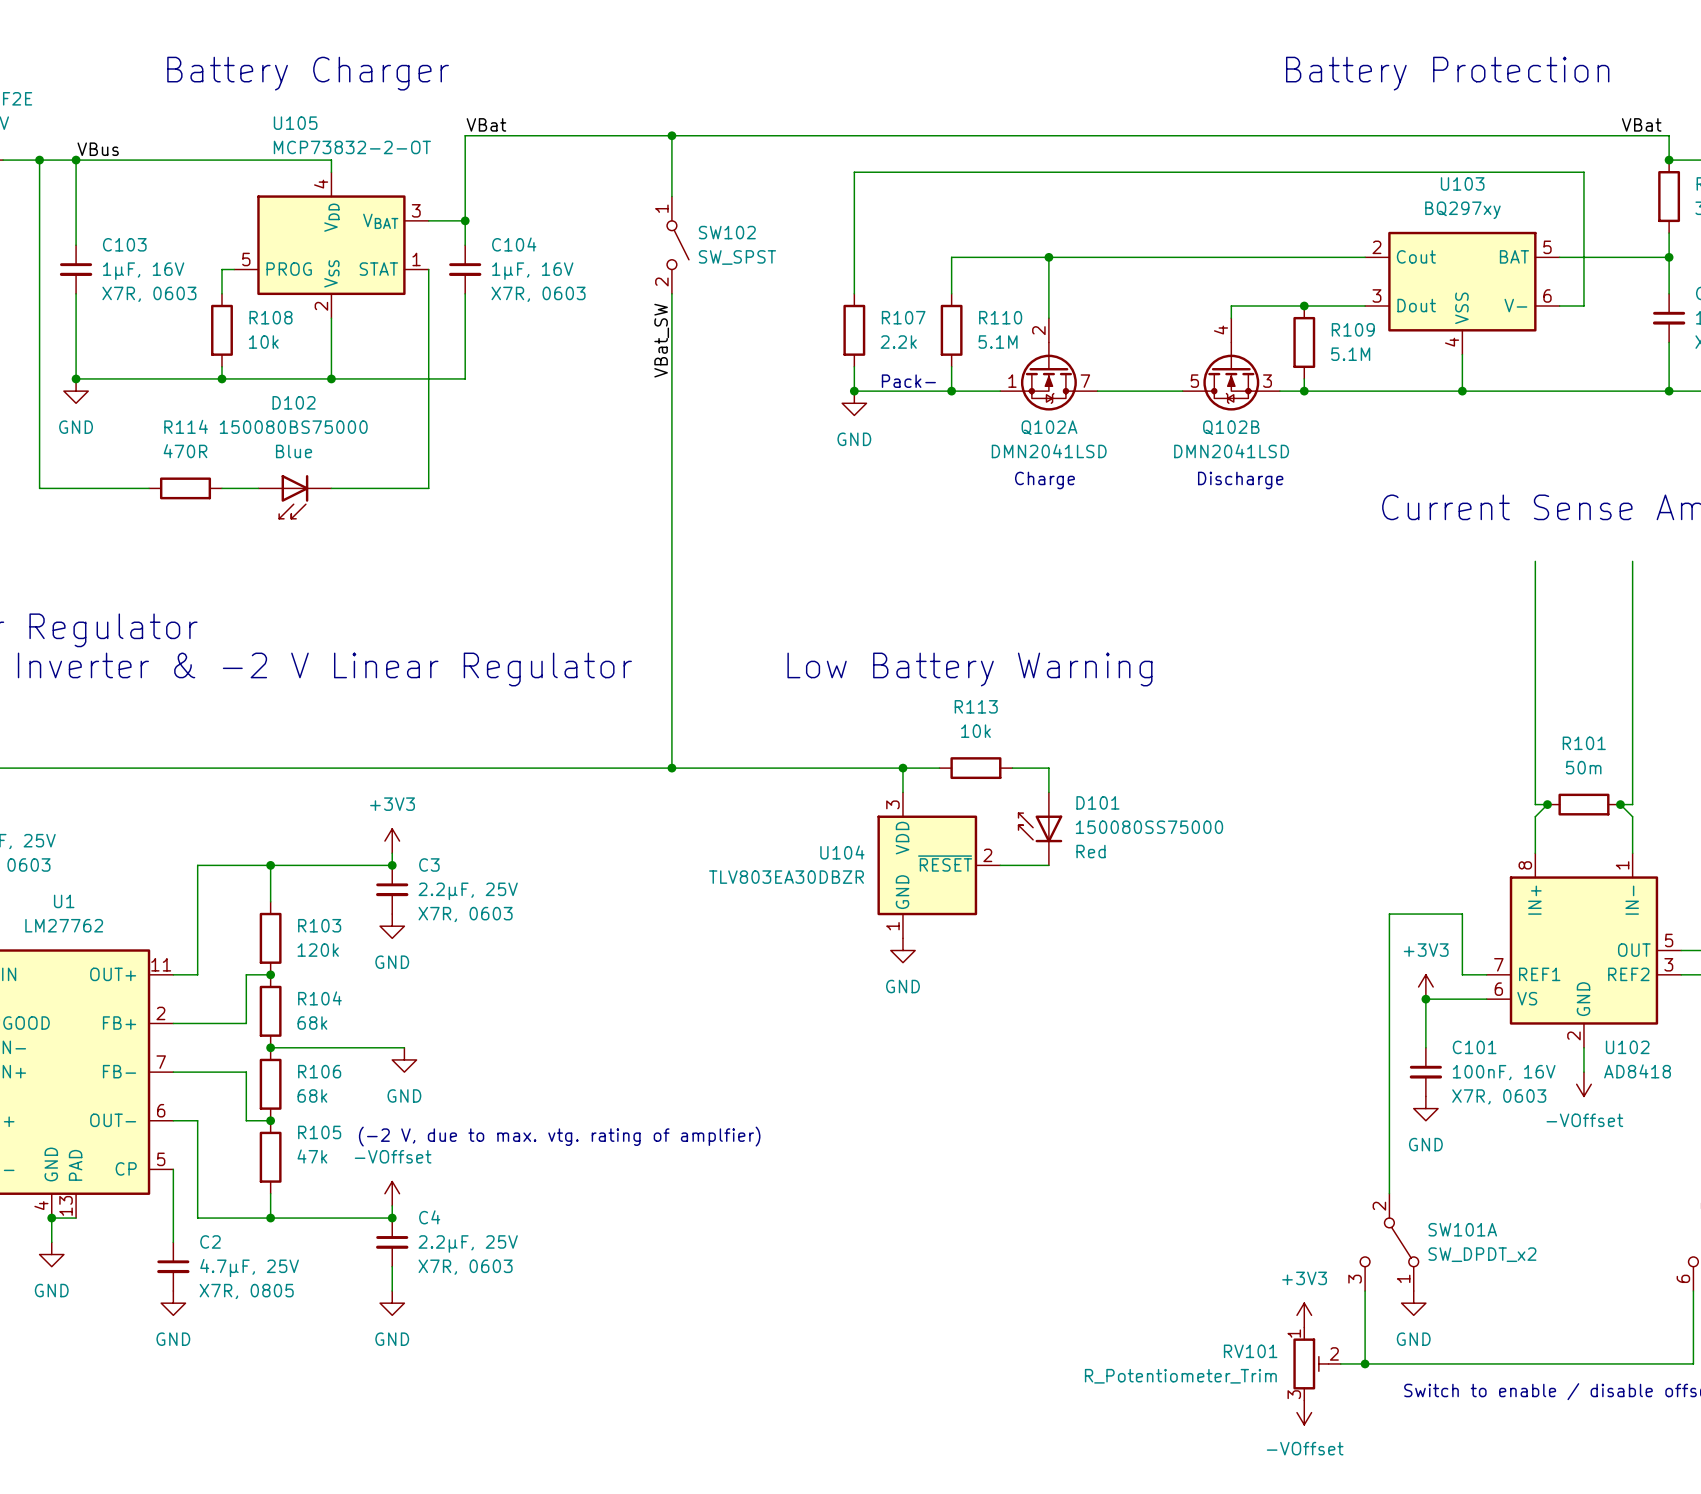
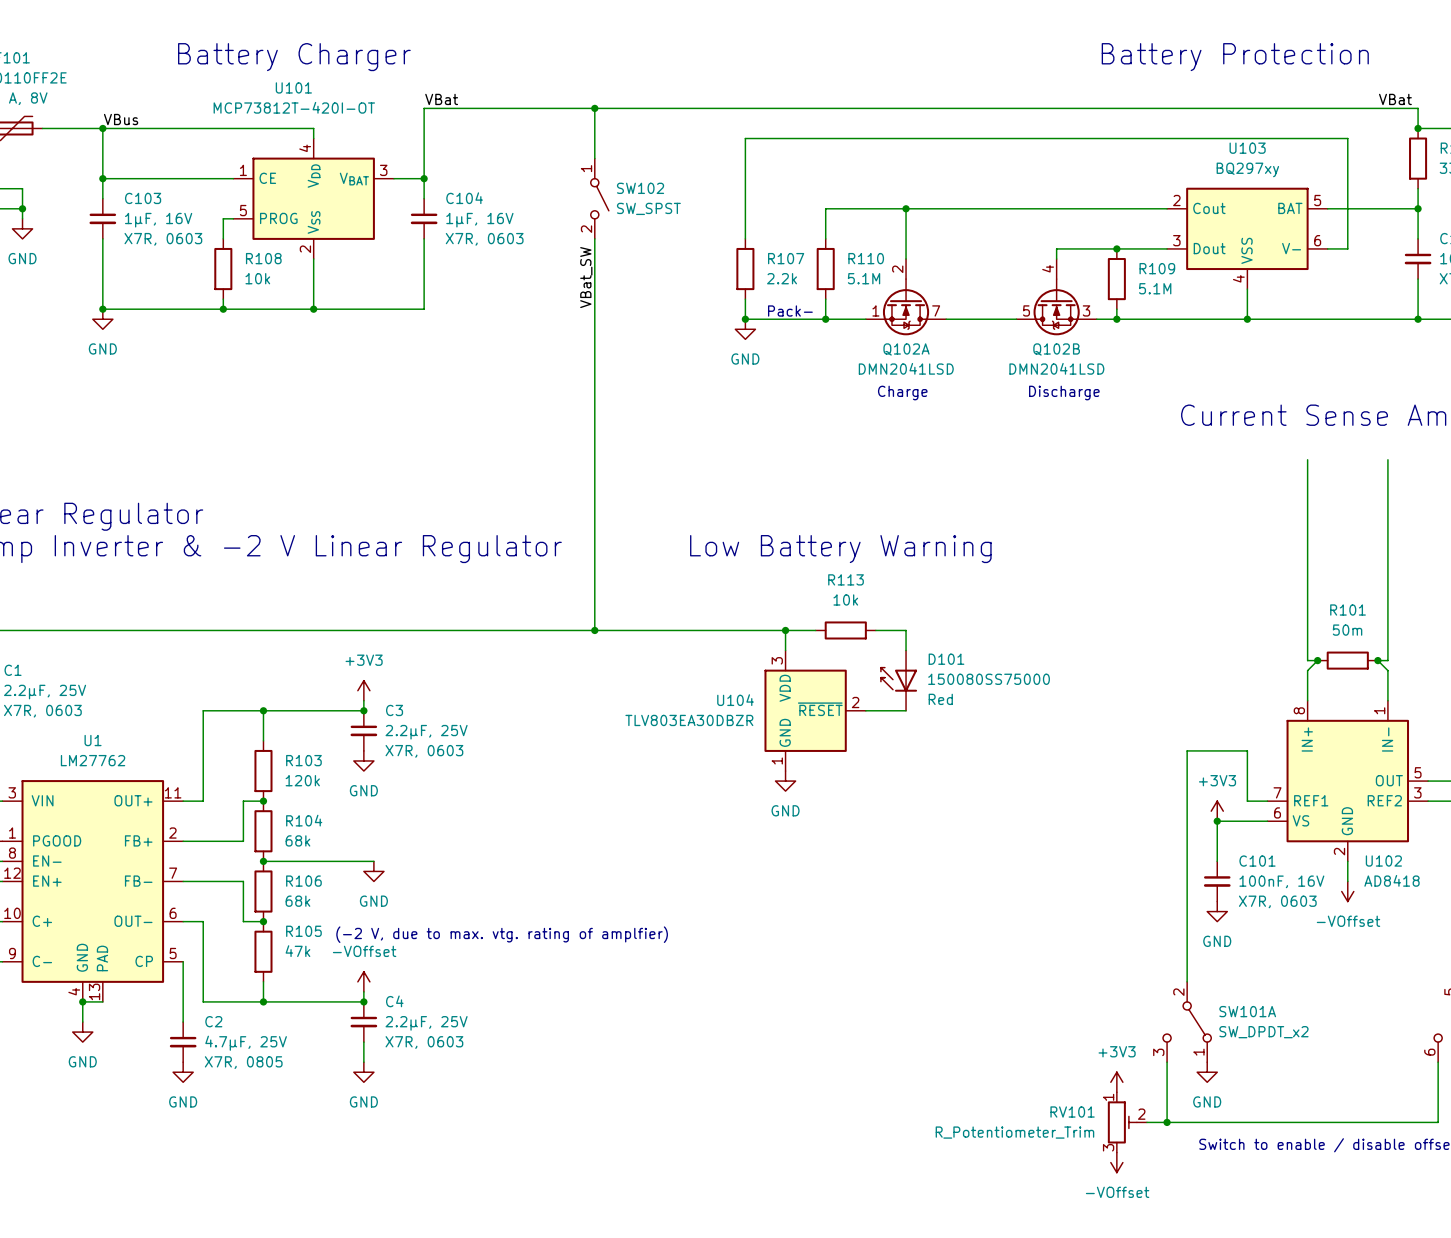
wire: (39, 160) (39, 488) (149, 488) -> none
junction: (39, 160) -> none
wire: none -> (102, 178) (233, 178)
junction: none -> (102, 178)
U105: MCP73832-2-OT (331, 245) -> none
U101: none -> MCP73812T-420I-OT (313, 198)
wire: (428, 269) (428, 488) (331, 488) -> none
R114: (185, 488) -> none
wire: (221, 488) (258, 488) -> none
D102: 150080BS75000 (294, 496) -> none

